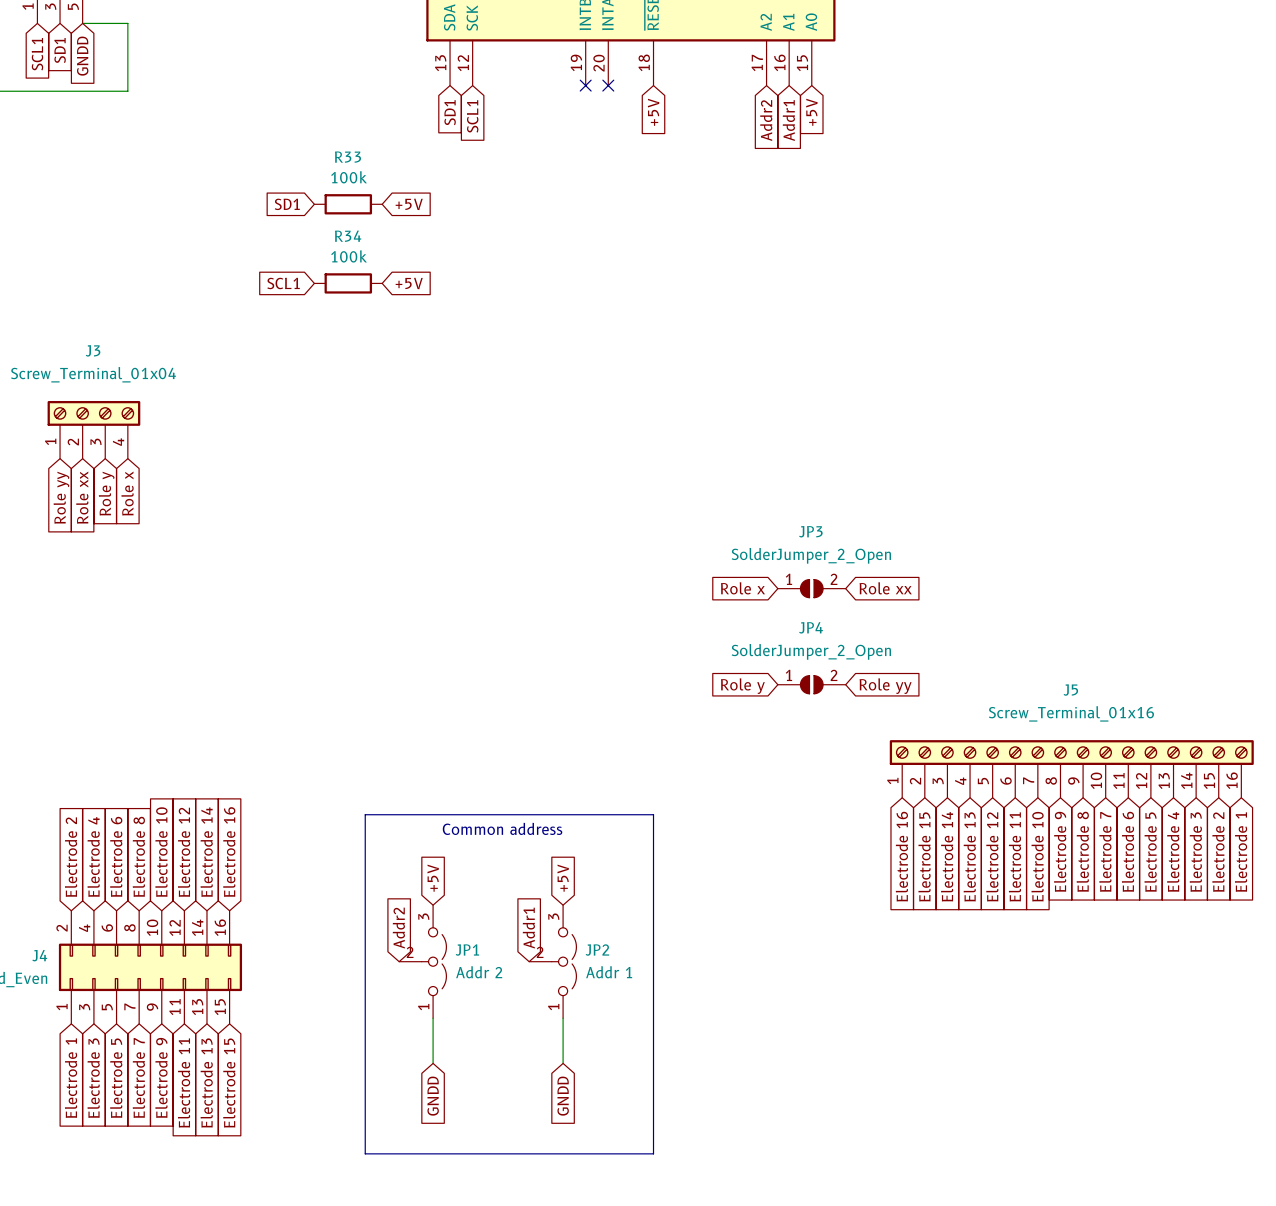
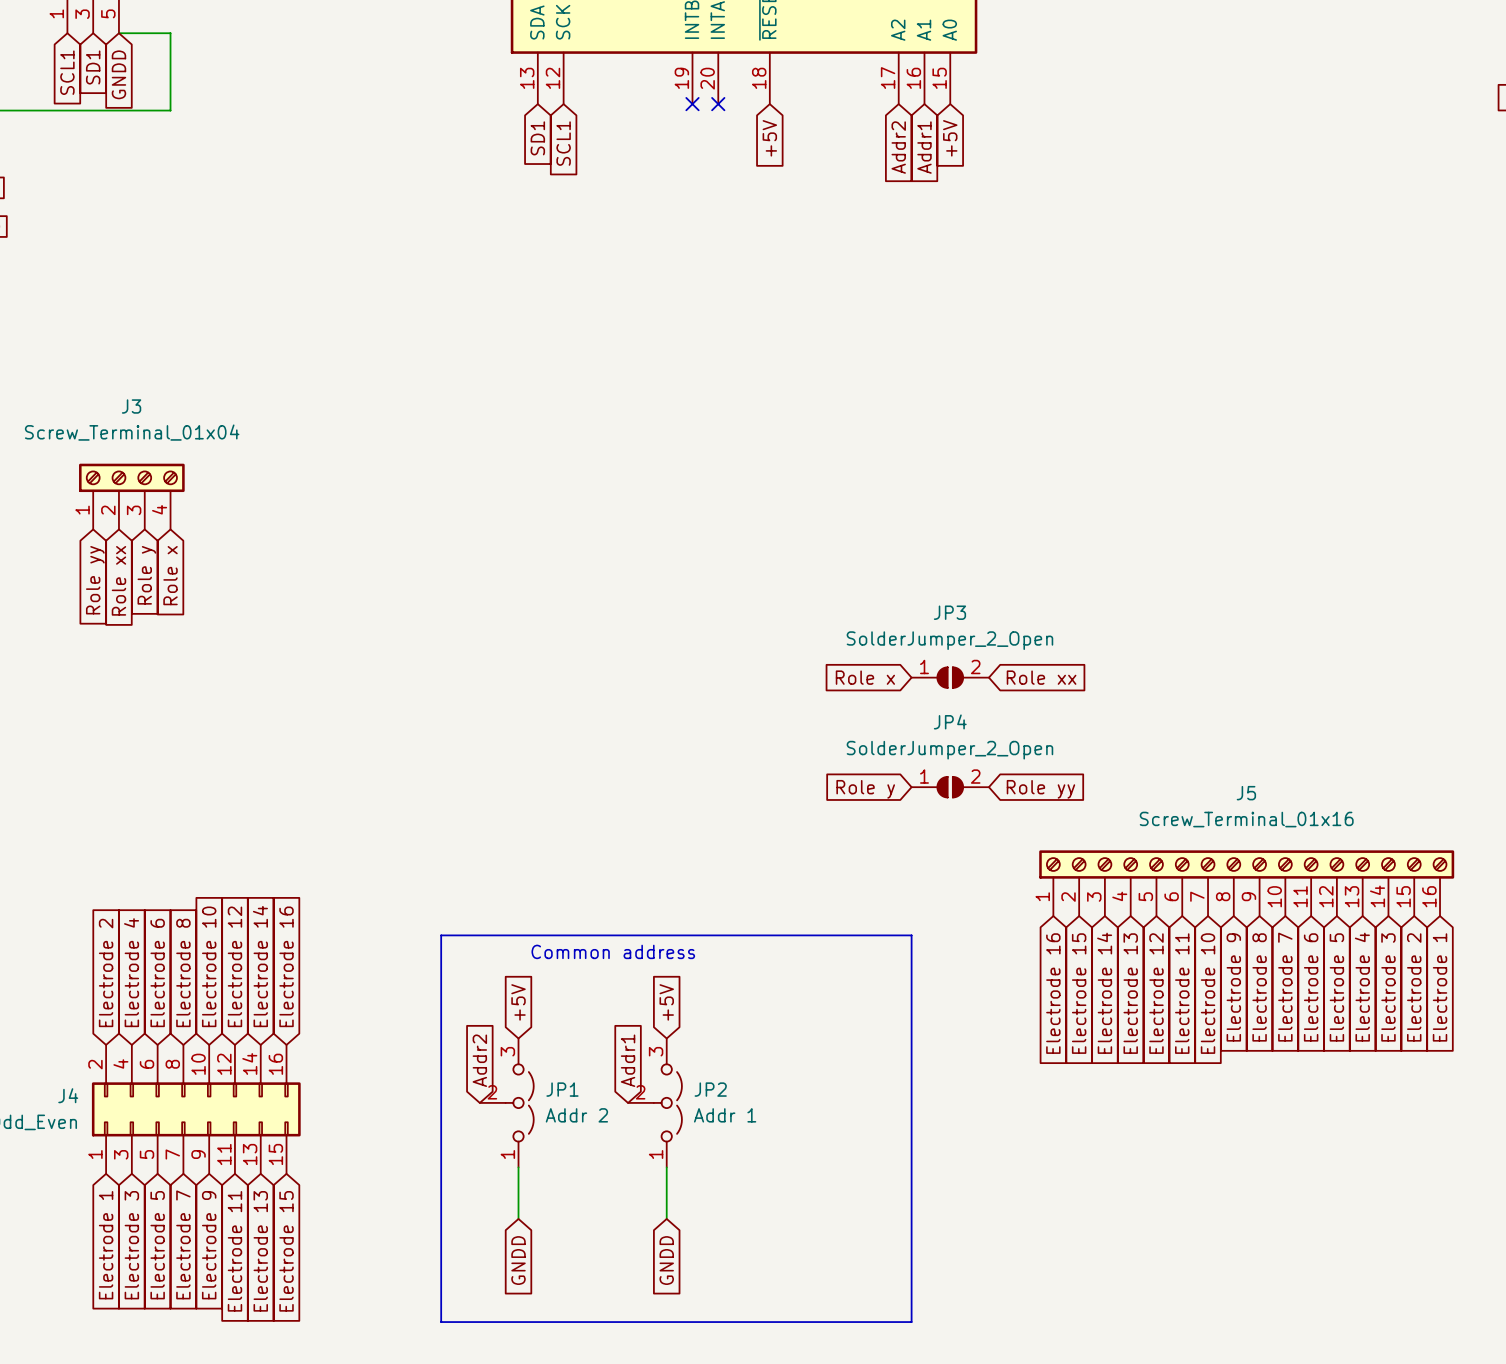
global label: SD1 (287, 204) -> none
R33: 100k (348, 204) -> none
global label: +5V (409, 204) -> none
global label: SCL1 (283, 283) -> none
R34: 100k (348, 283) -> none
global label: +5V (409, 283) -> none
line: (653, 814) (653, 1153) -> (769, 935) (911, 935) (911, 1322) (769, 1322)

